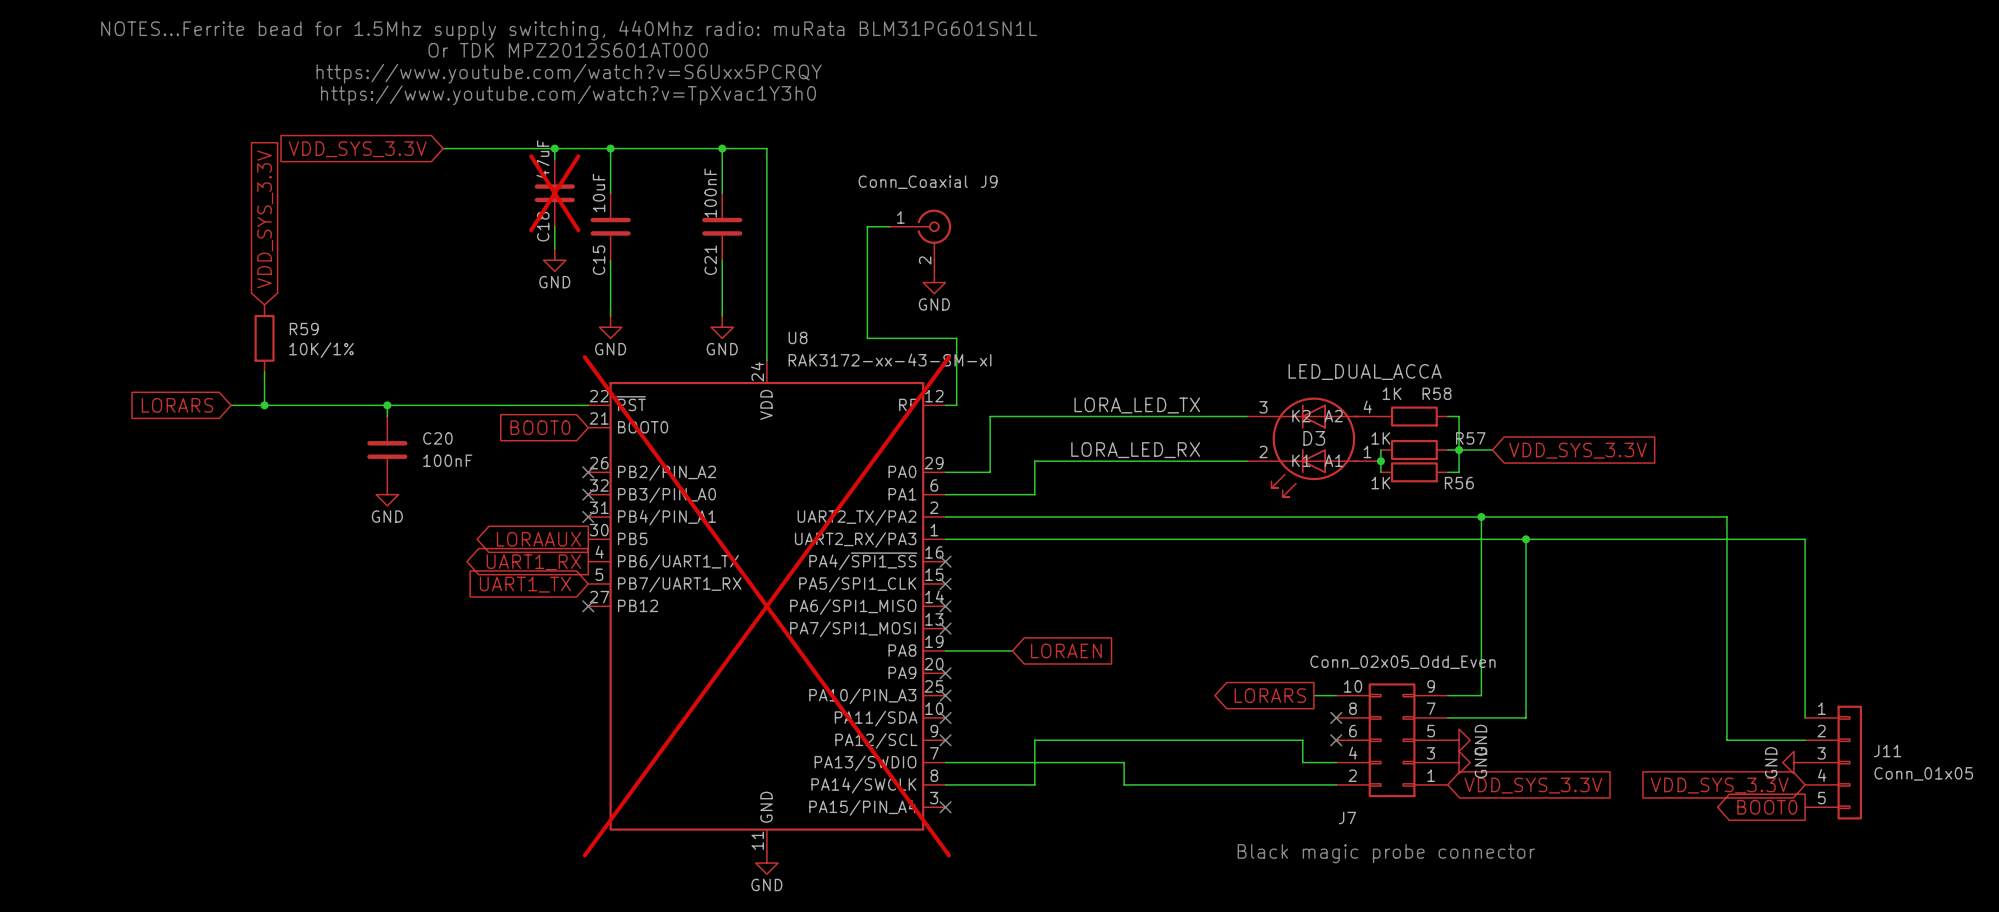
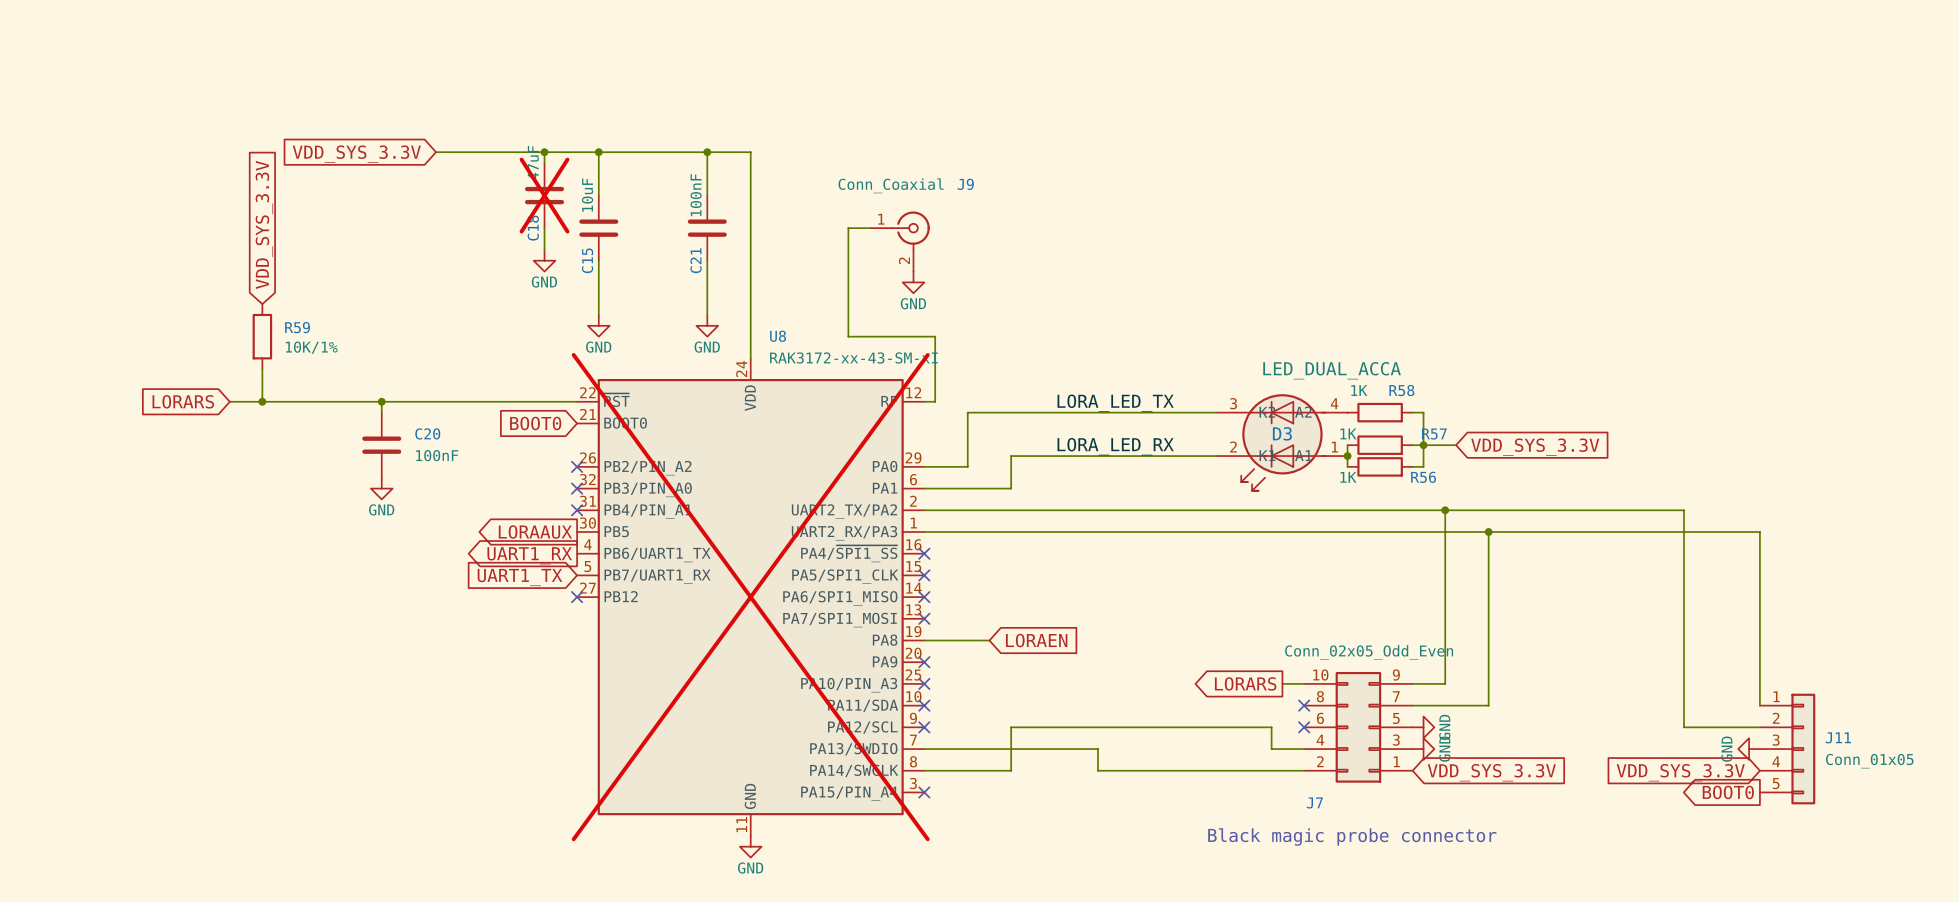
text: NOTES...Ferrite bead for 1.5Mhz supply switching, 440Mhz radio: muRata BLM31PG601SN1L (569, 30) -> none
text: Or TDK MPZ2012S601AT000 (568, 50) -> none
text: https://www.youtube.com/watch?v=S6Uxx5PCRQY (569, 73) -> none
text: https://www.youtube.com/watch?v=TpXvac1Y3h0 (568, 95) -> none

